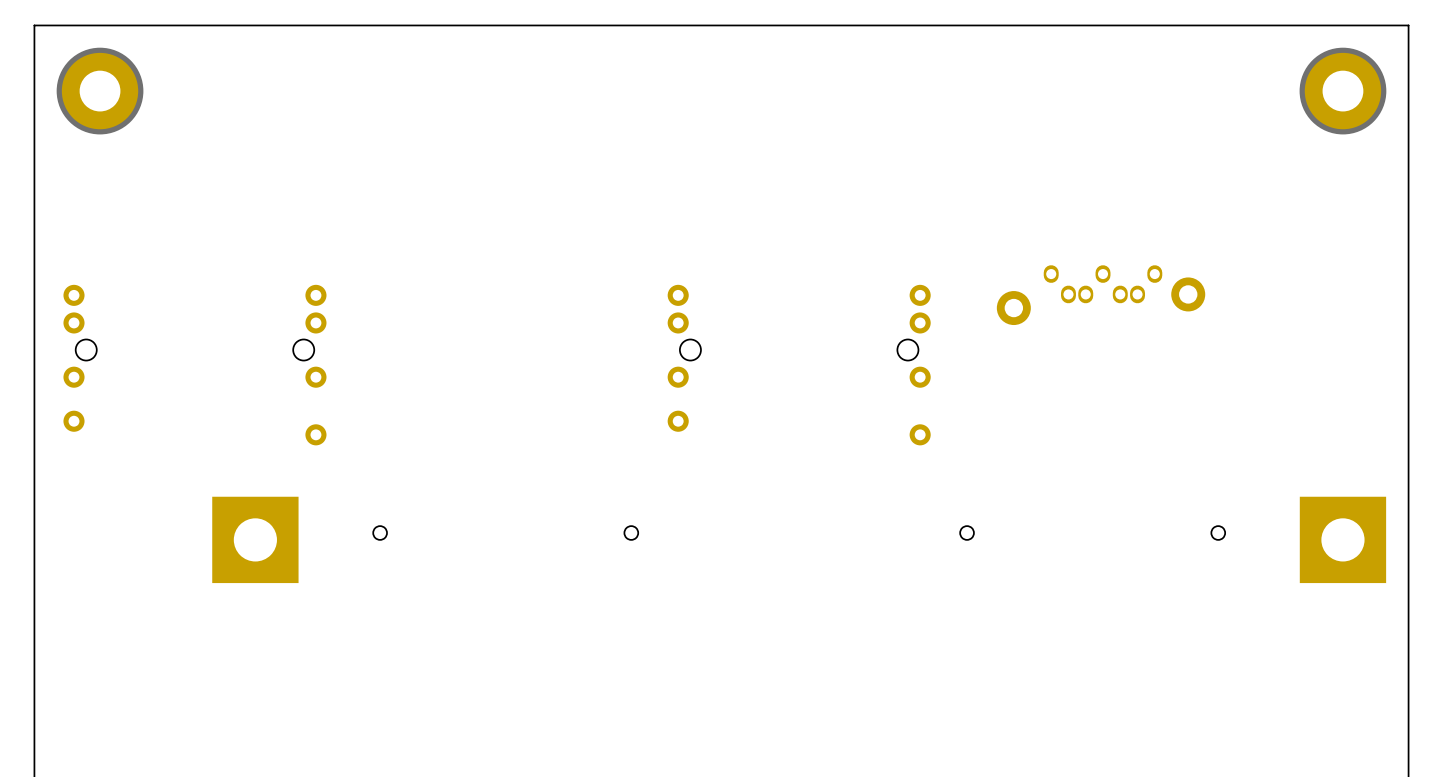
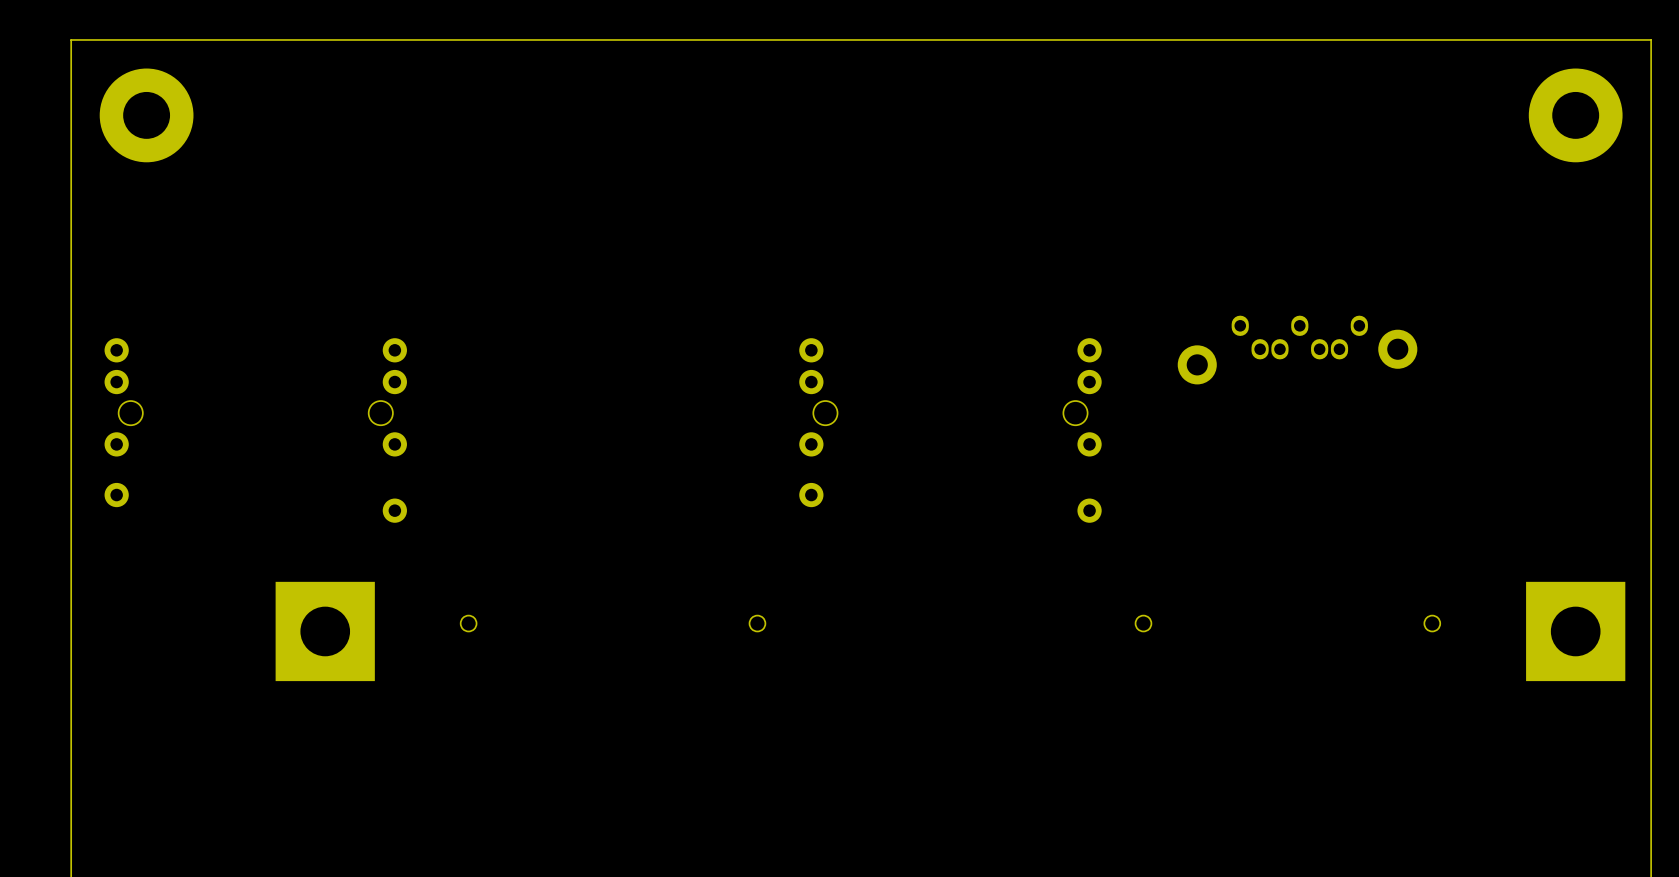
part footprint: [56, 47, 144, 135] -> [99, 68, 194, 163]
part footprint: [1299, 47, 1387, 135] -> [1528, 68, 1623, 163]

